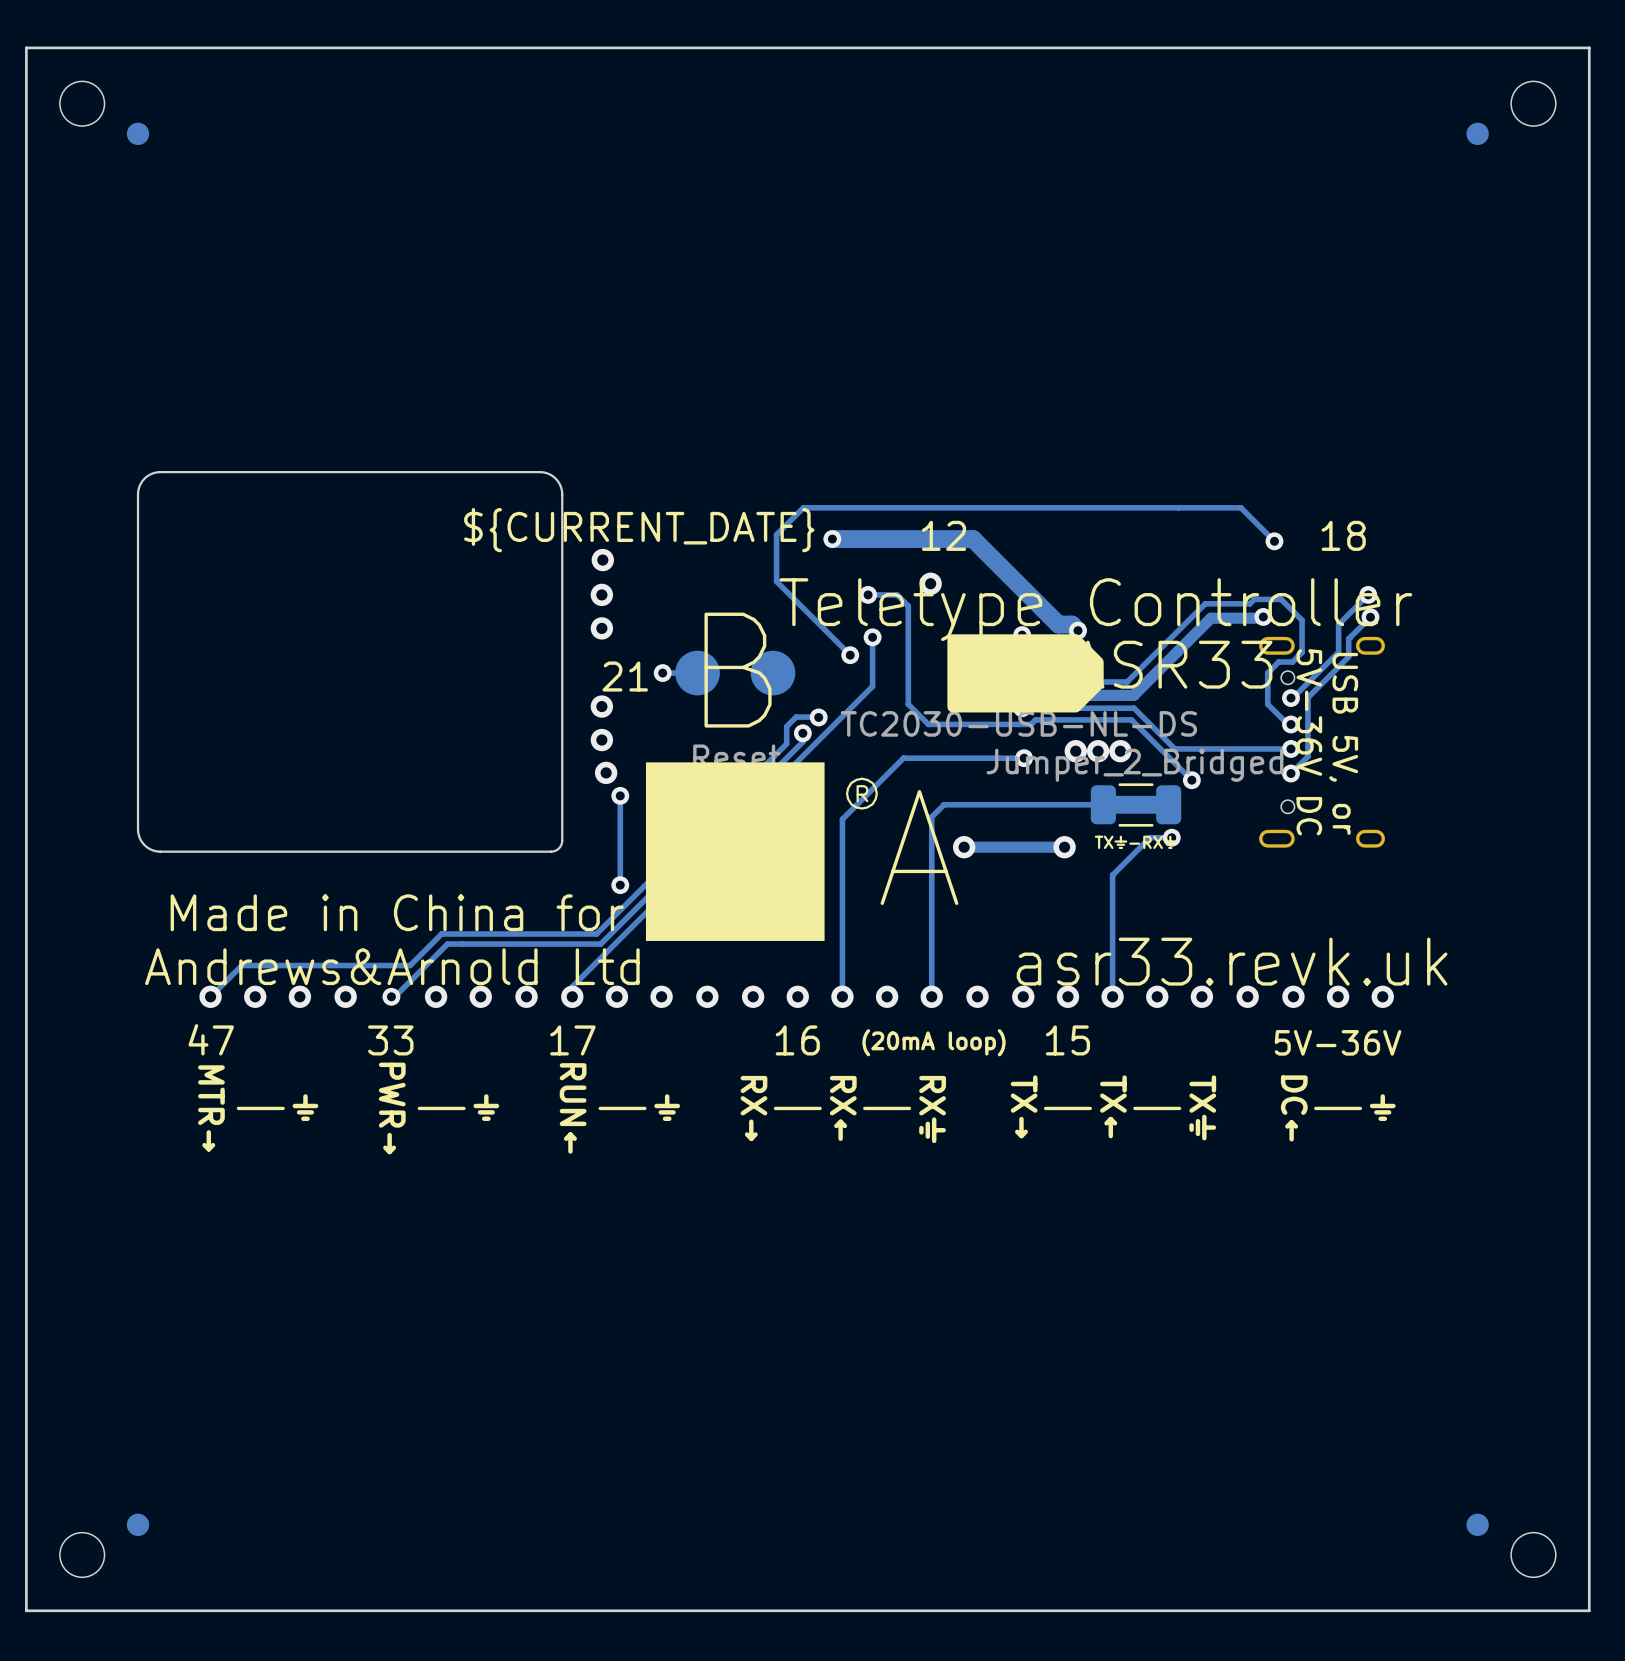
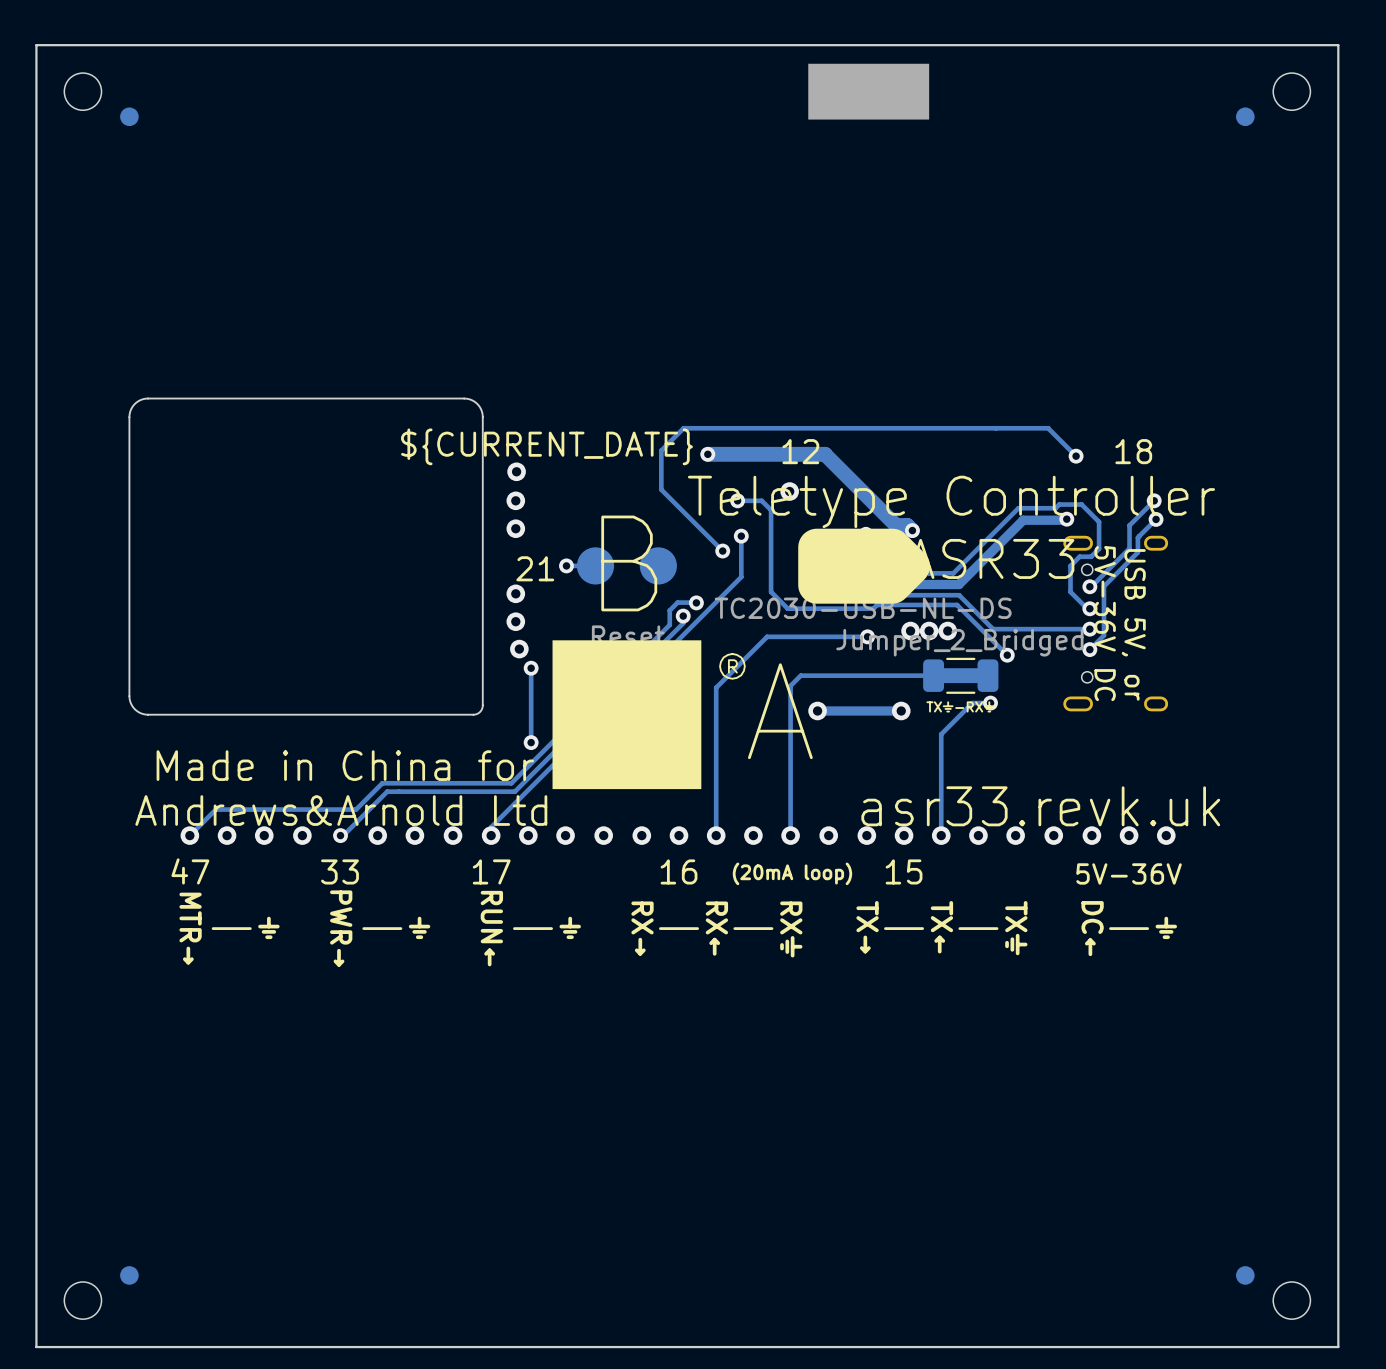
part footprint: [25, 46, 1591, 1613] -> [35, 44, 1340, 1349]
text position: Teletype Controller (1095, 609) -> Teletype Controller (951, 501)
part footprint: [947, 634, 1104, 713] -> [798, 528, 930, 604]

